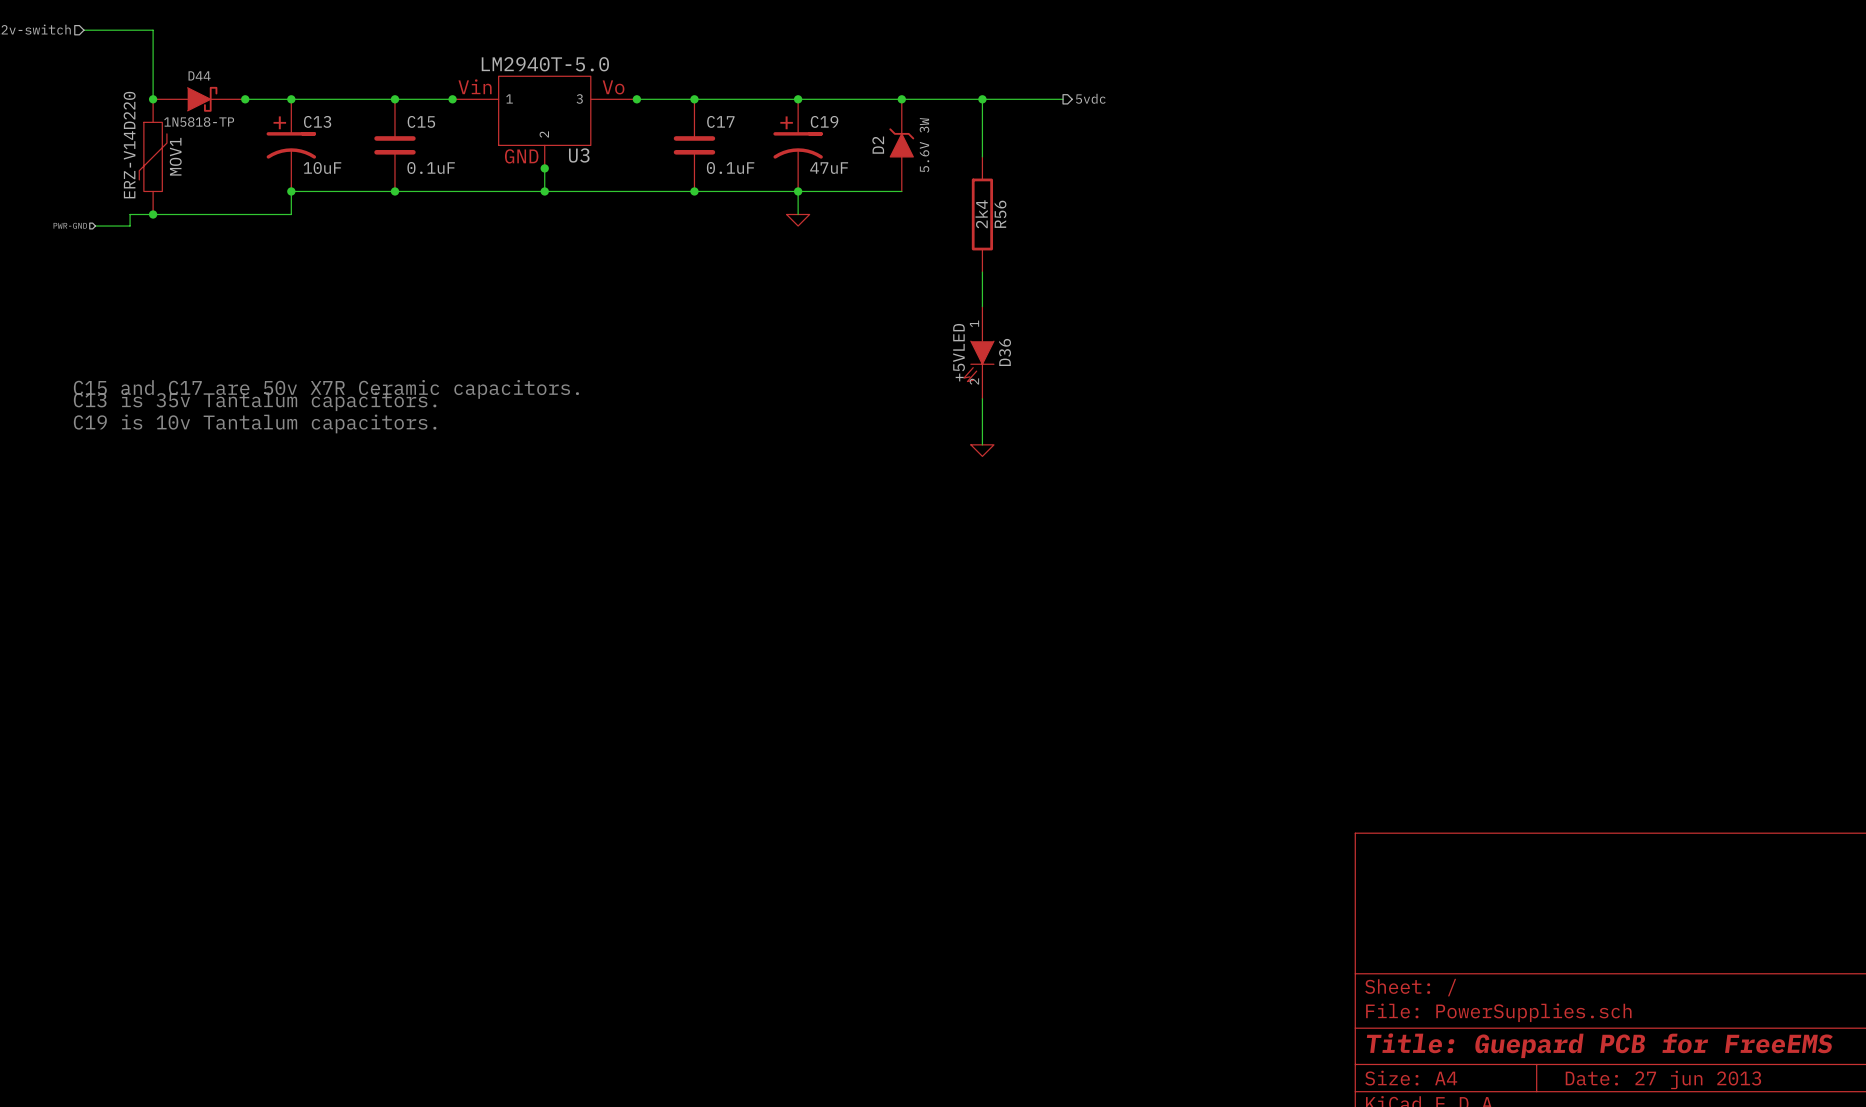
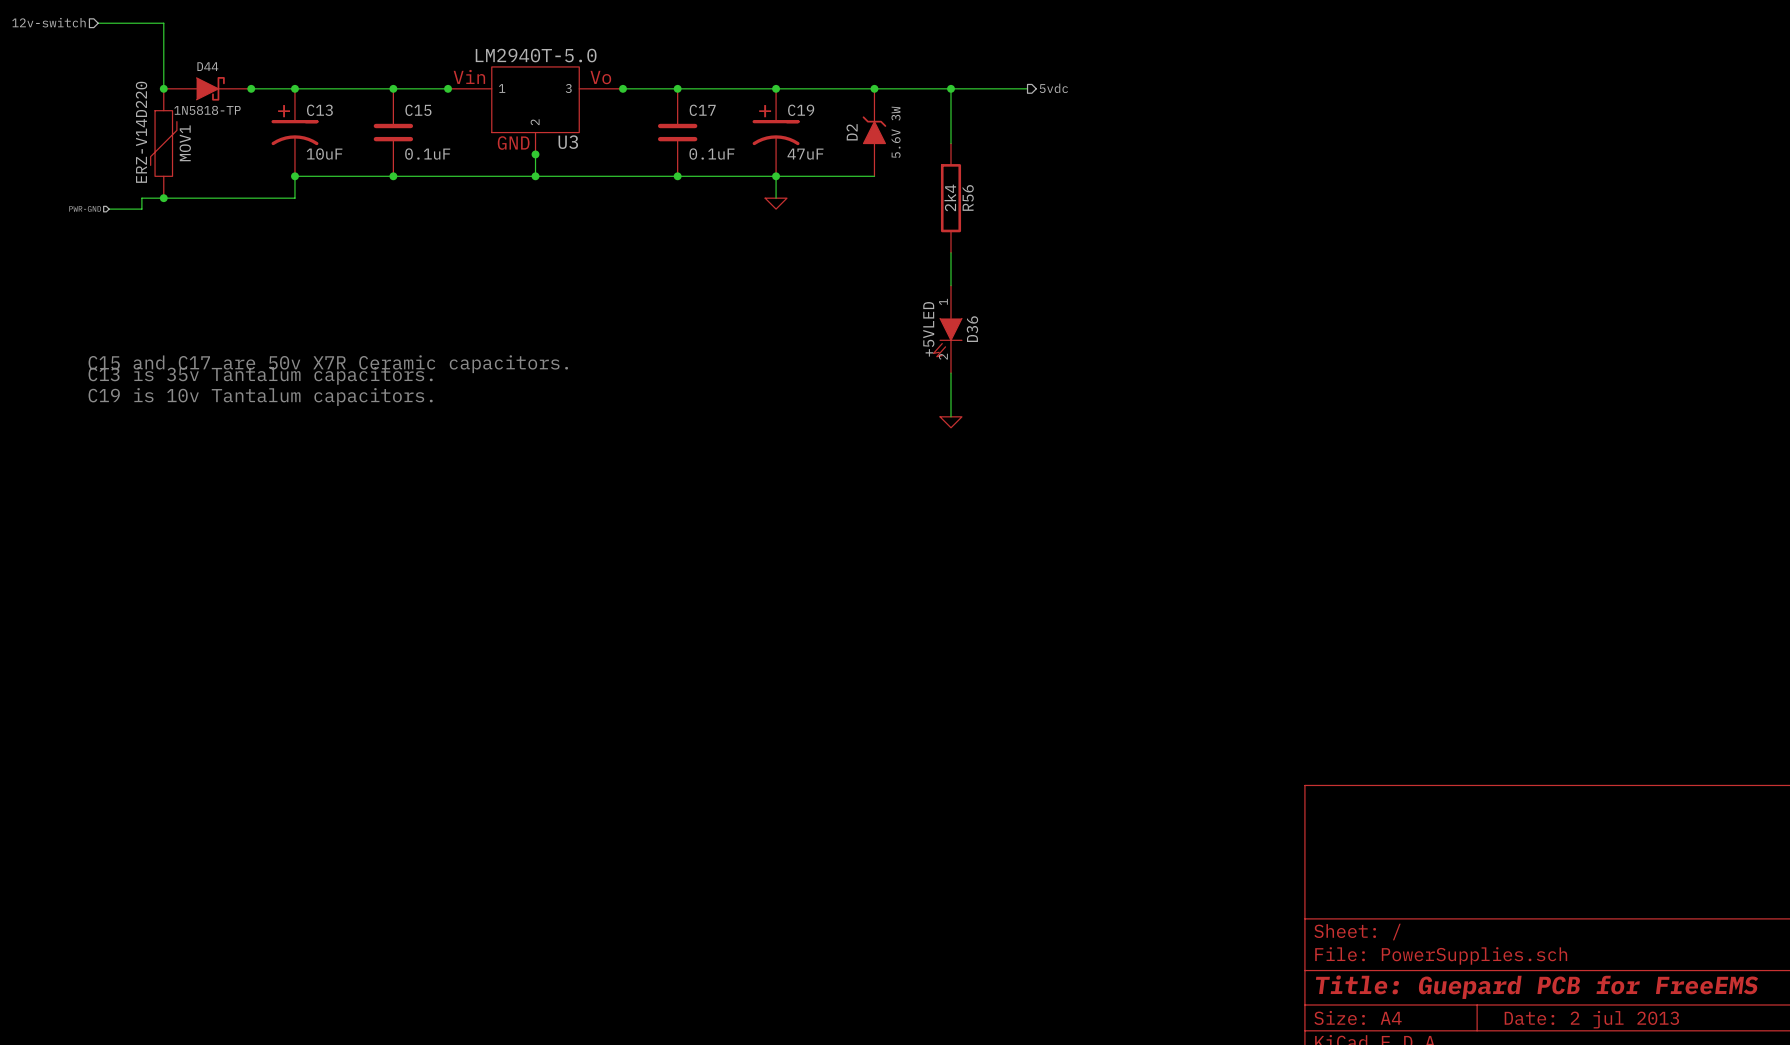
title block: Date: 27 jun 2013 (1663, 1079) -> Date: 2 jul 2013 (1591, 1019)

